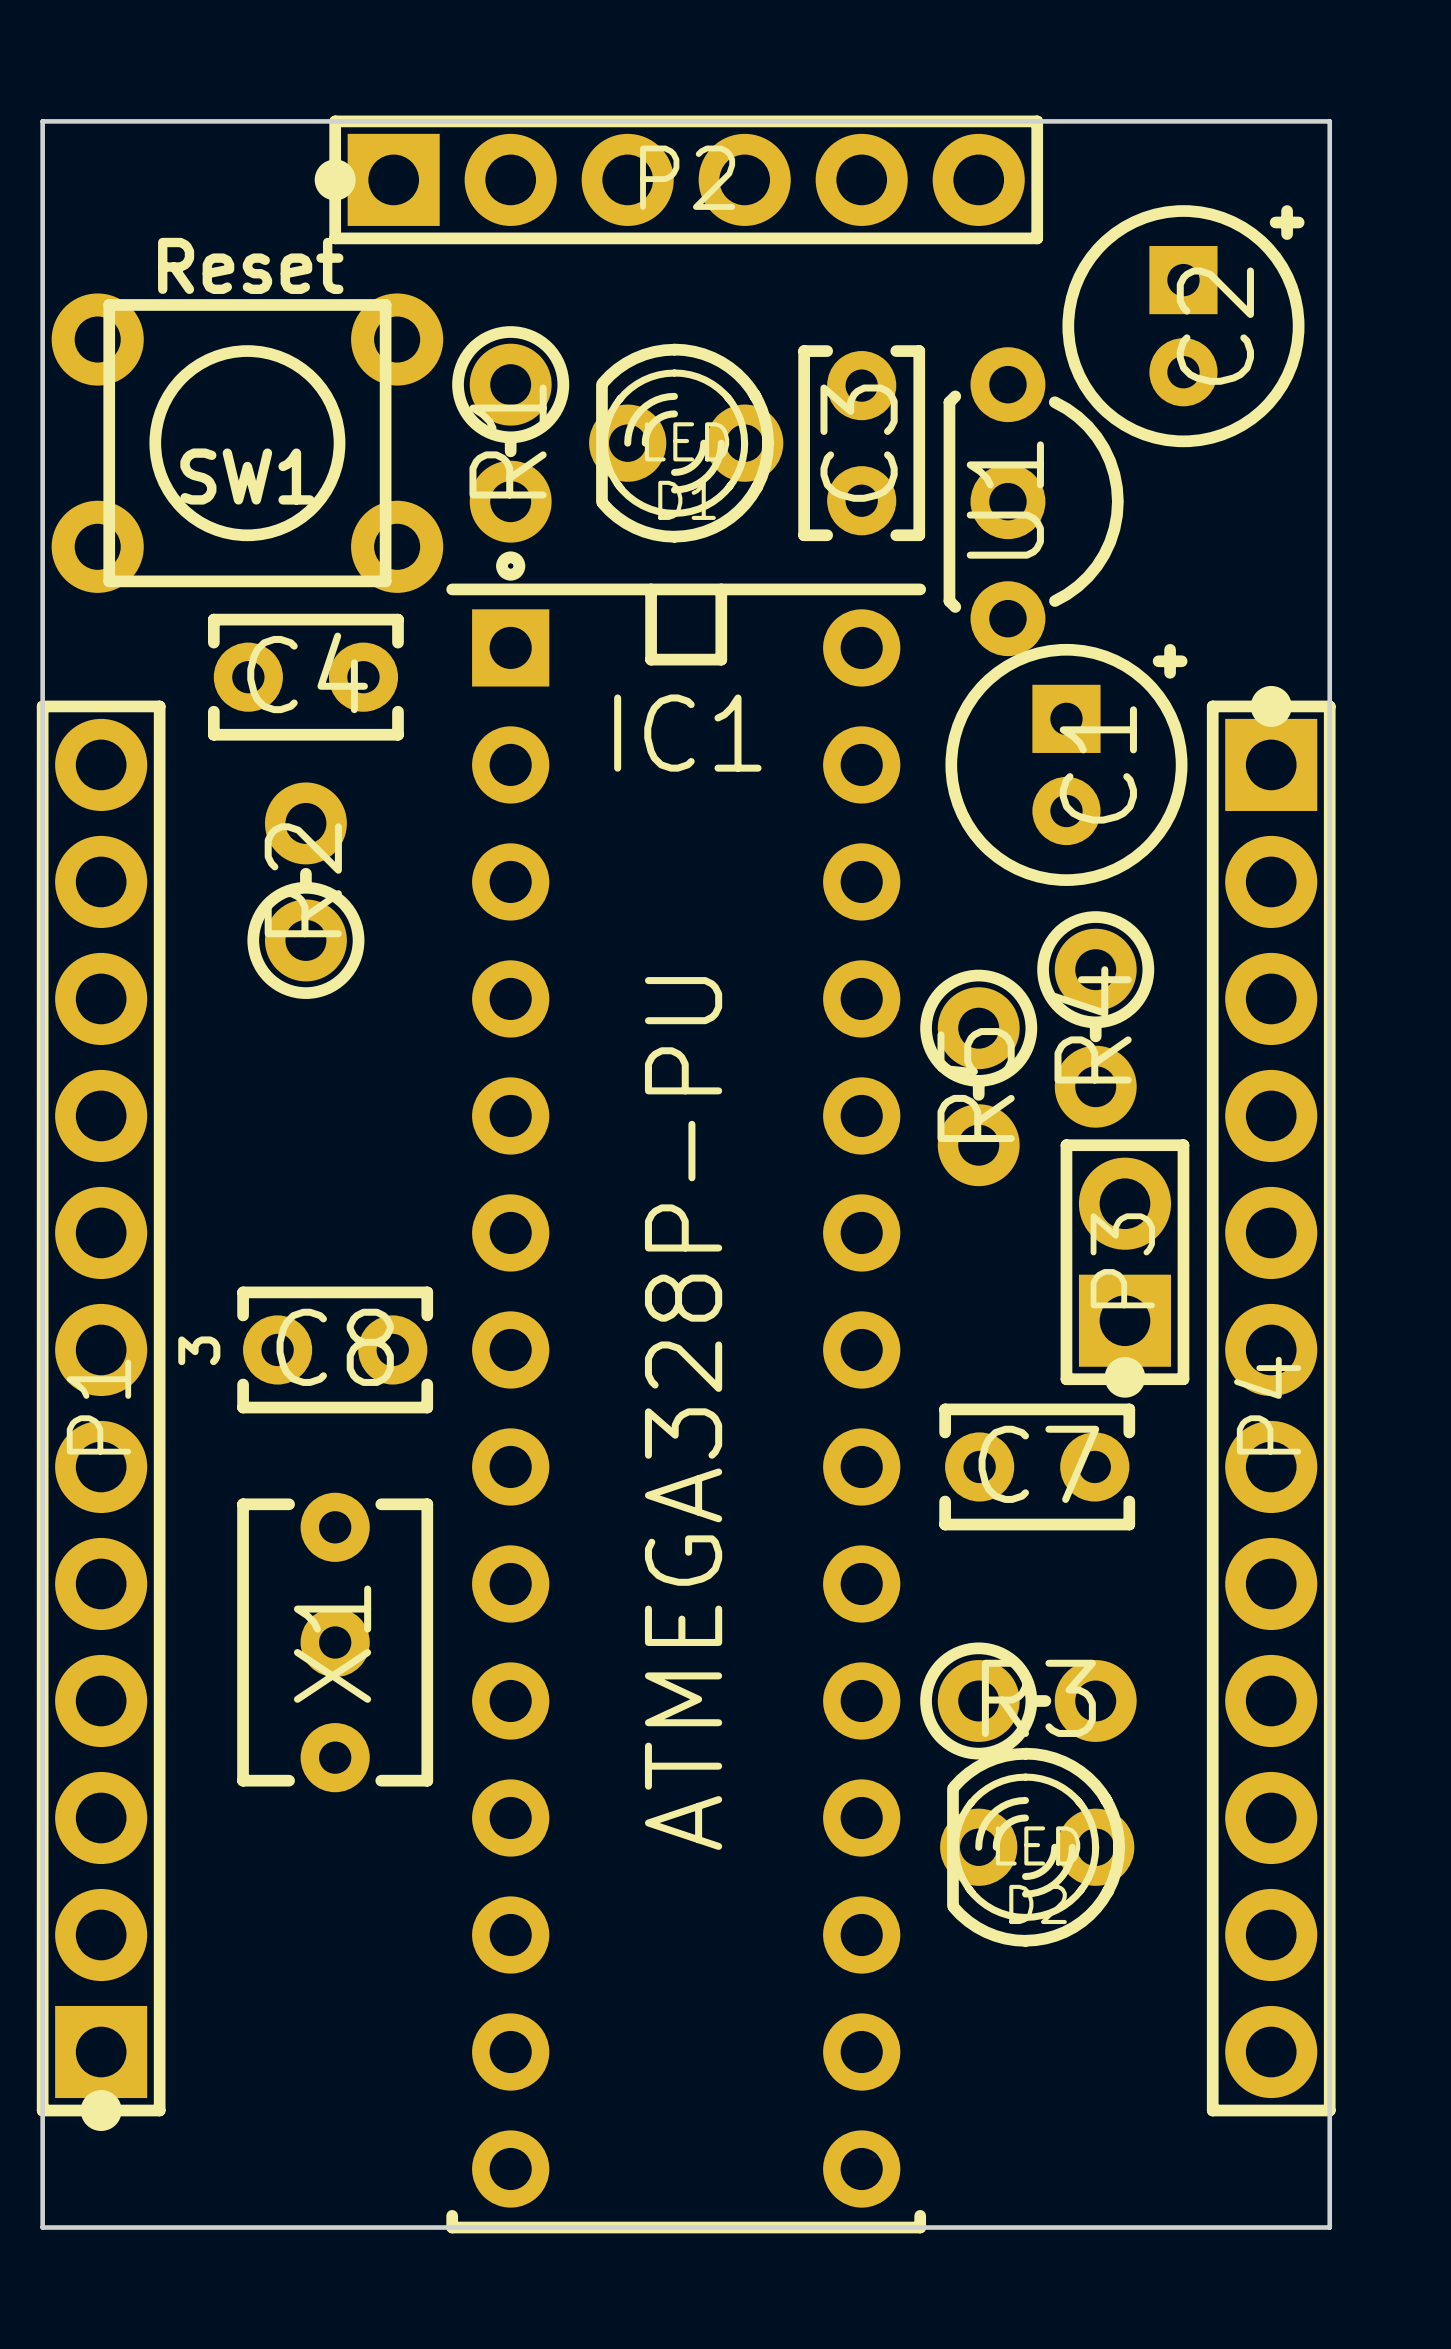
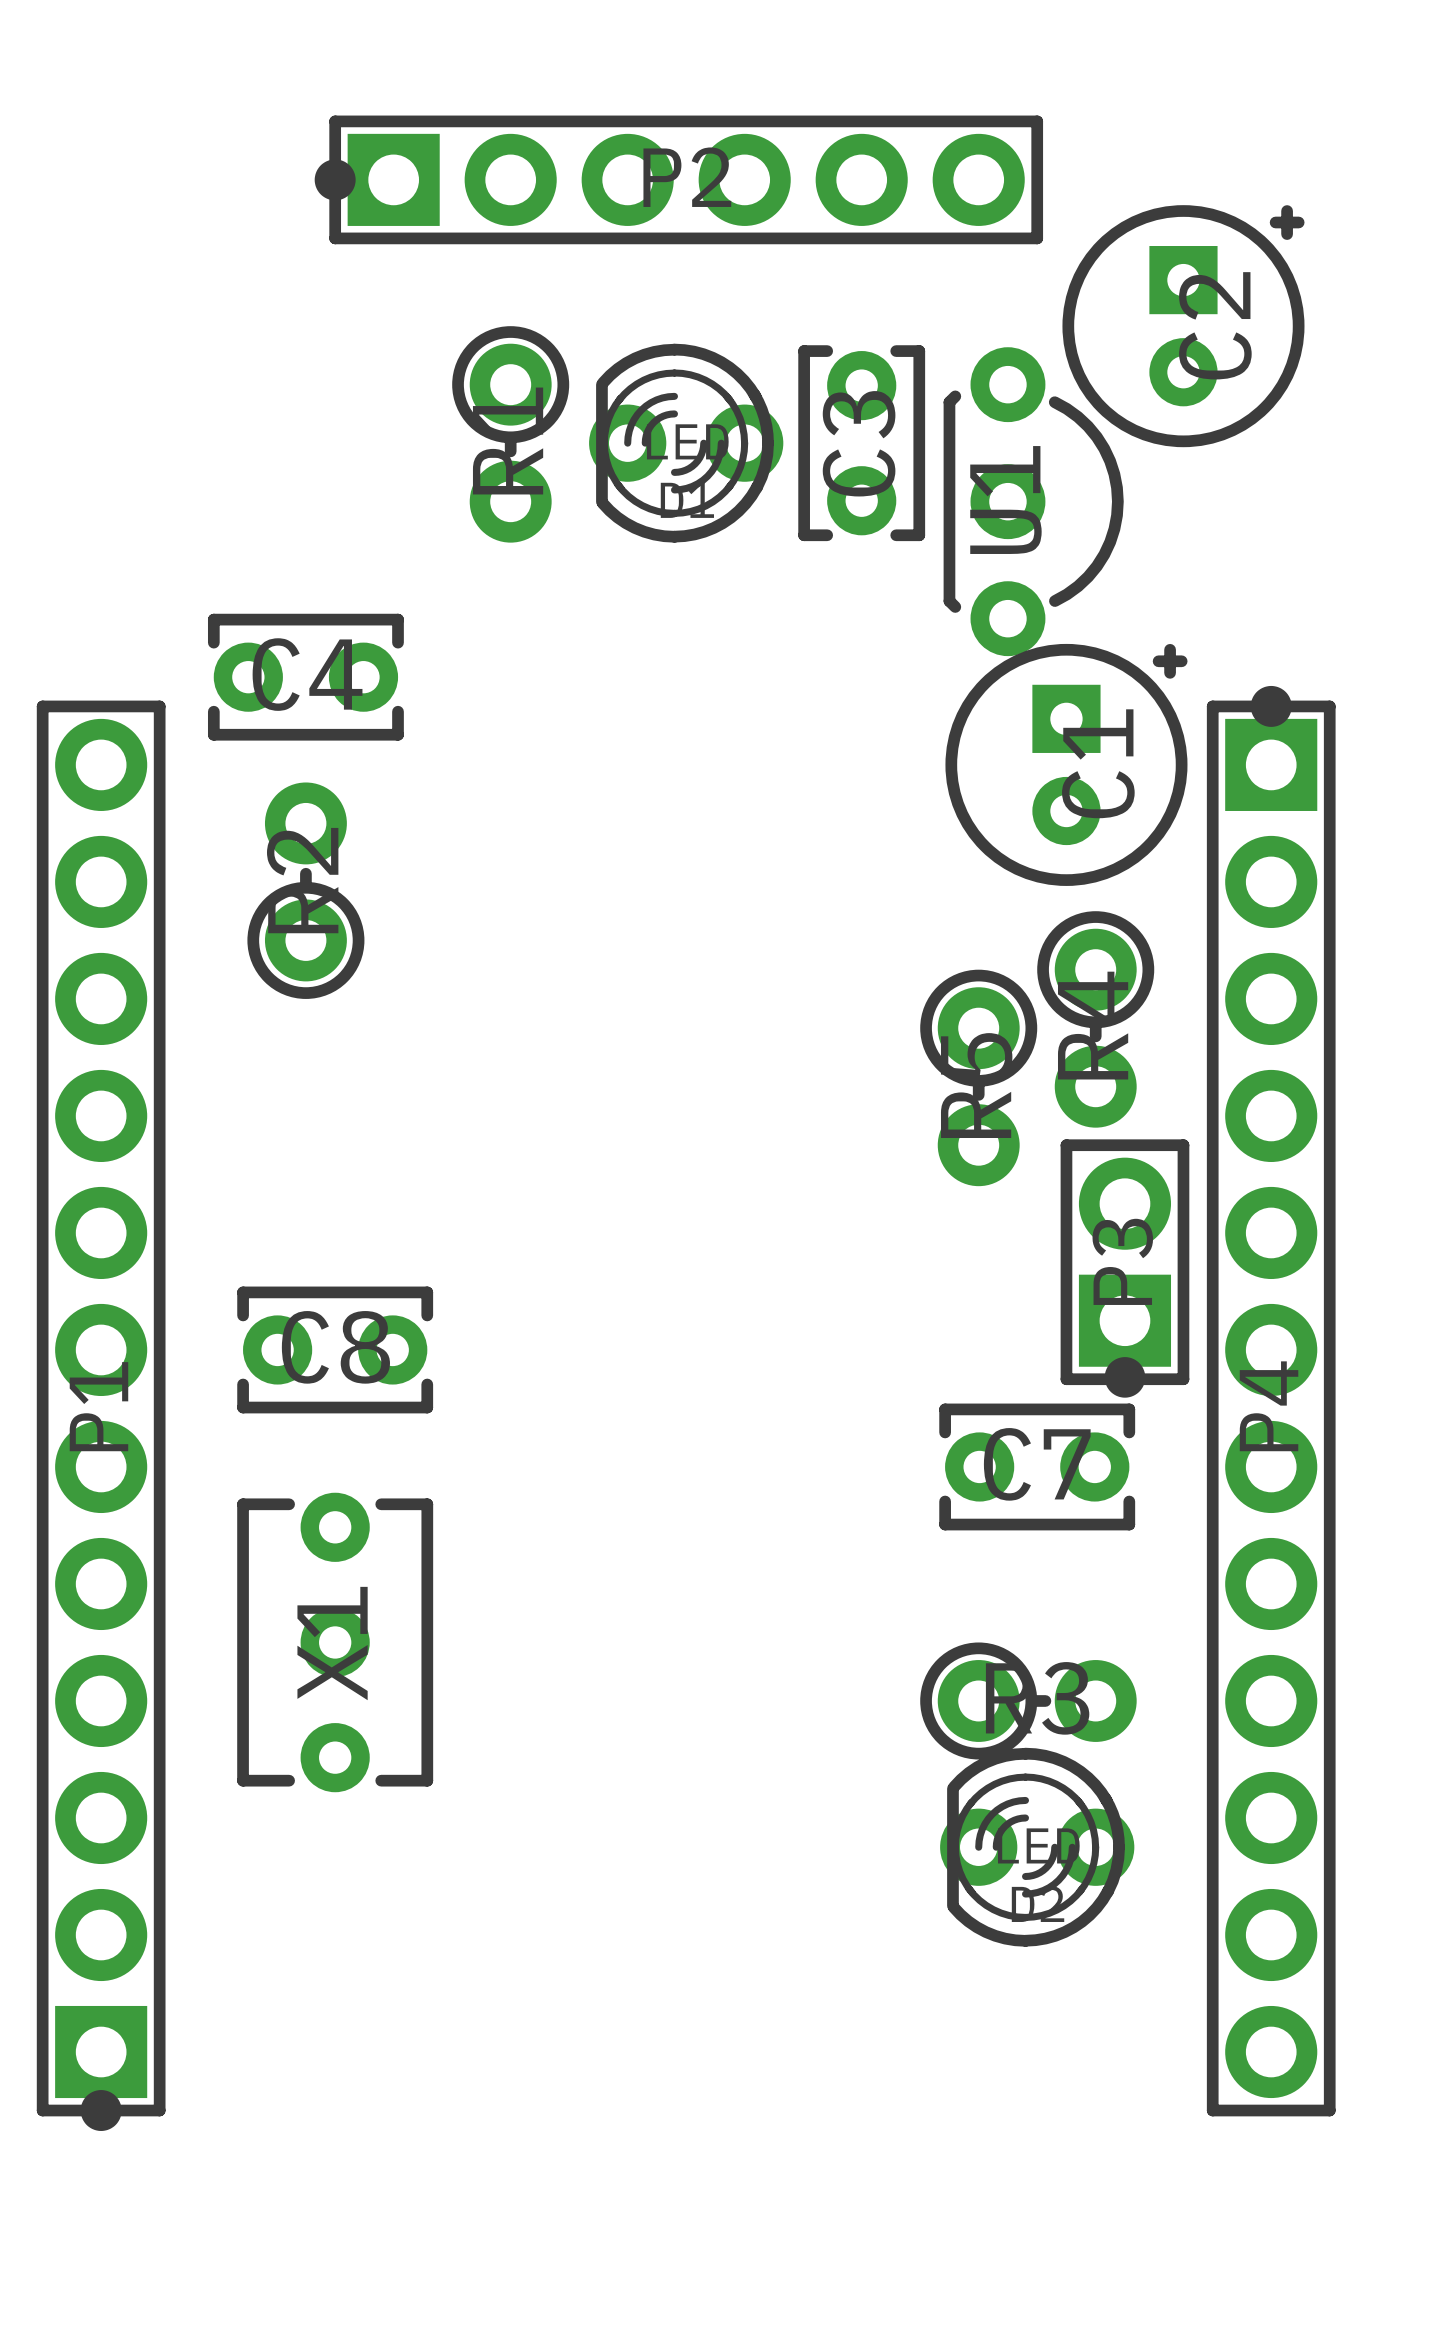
board edge: (42, 121) (42, 2227) (1329, 2227) (1329, 121) (42, 121) -> none
SW1: Reset (247, 443) -> none
text: 3 (199, 1350) -> none
IC1: ATMEGA328P-PU (686, 1392) -> none

